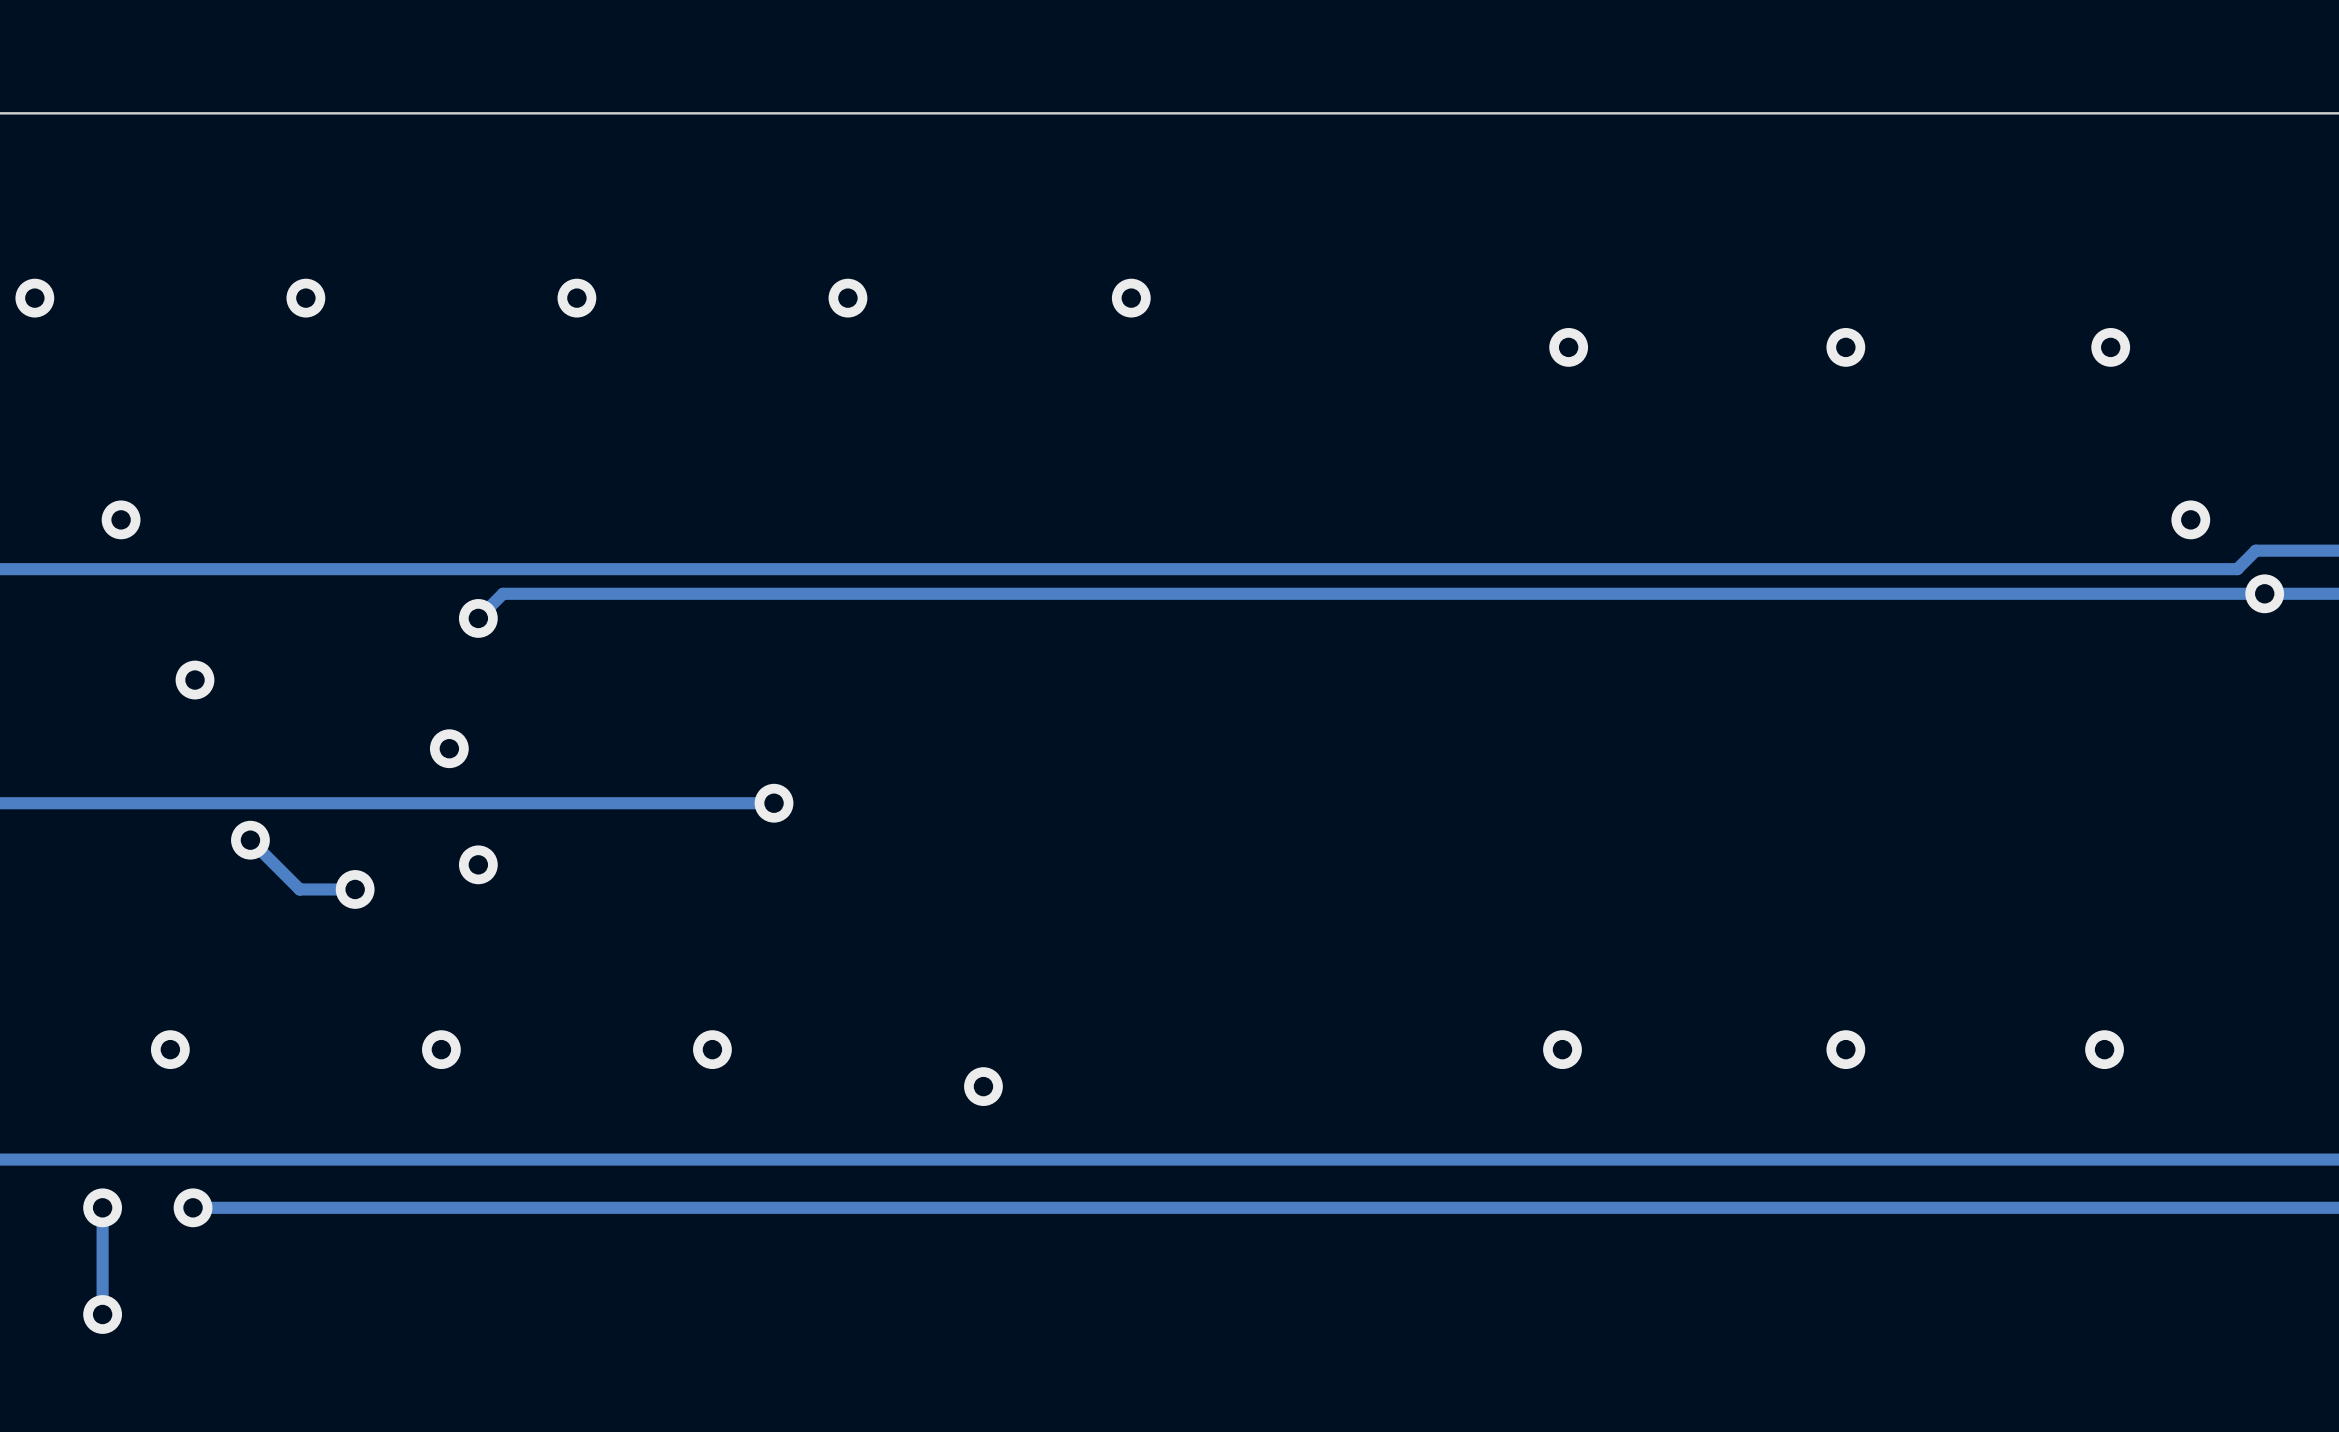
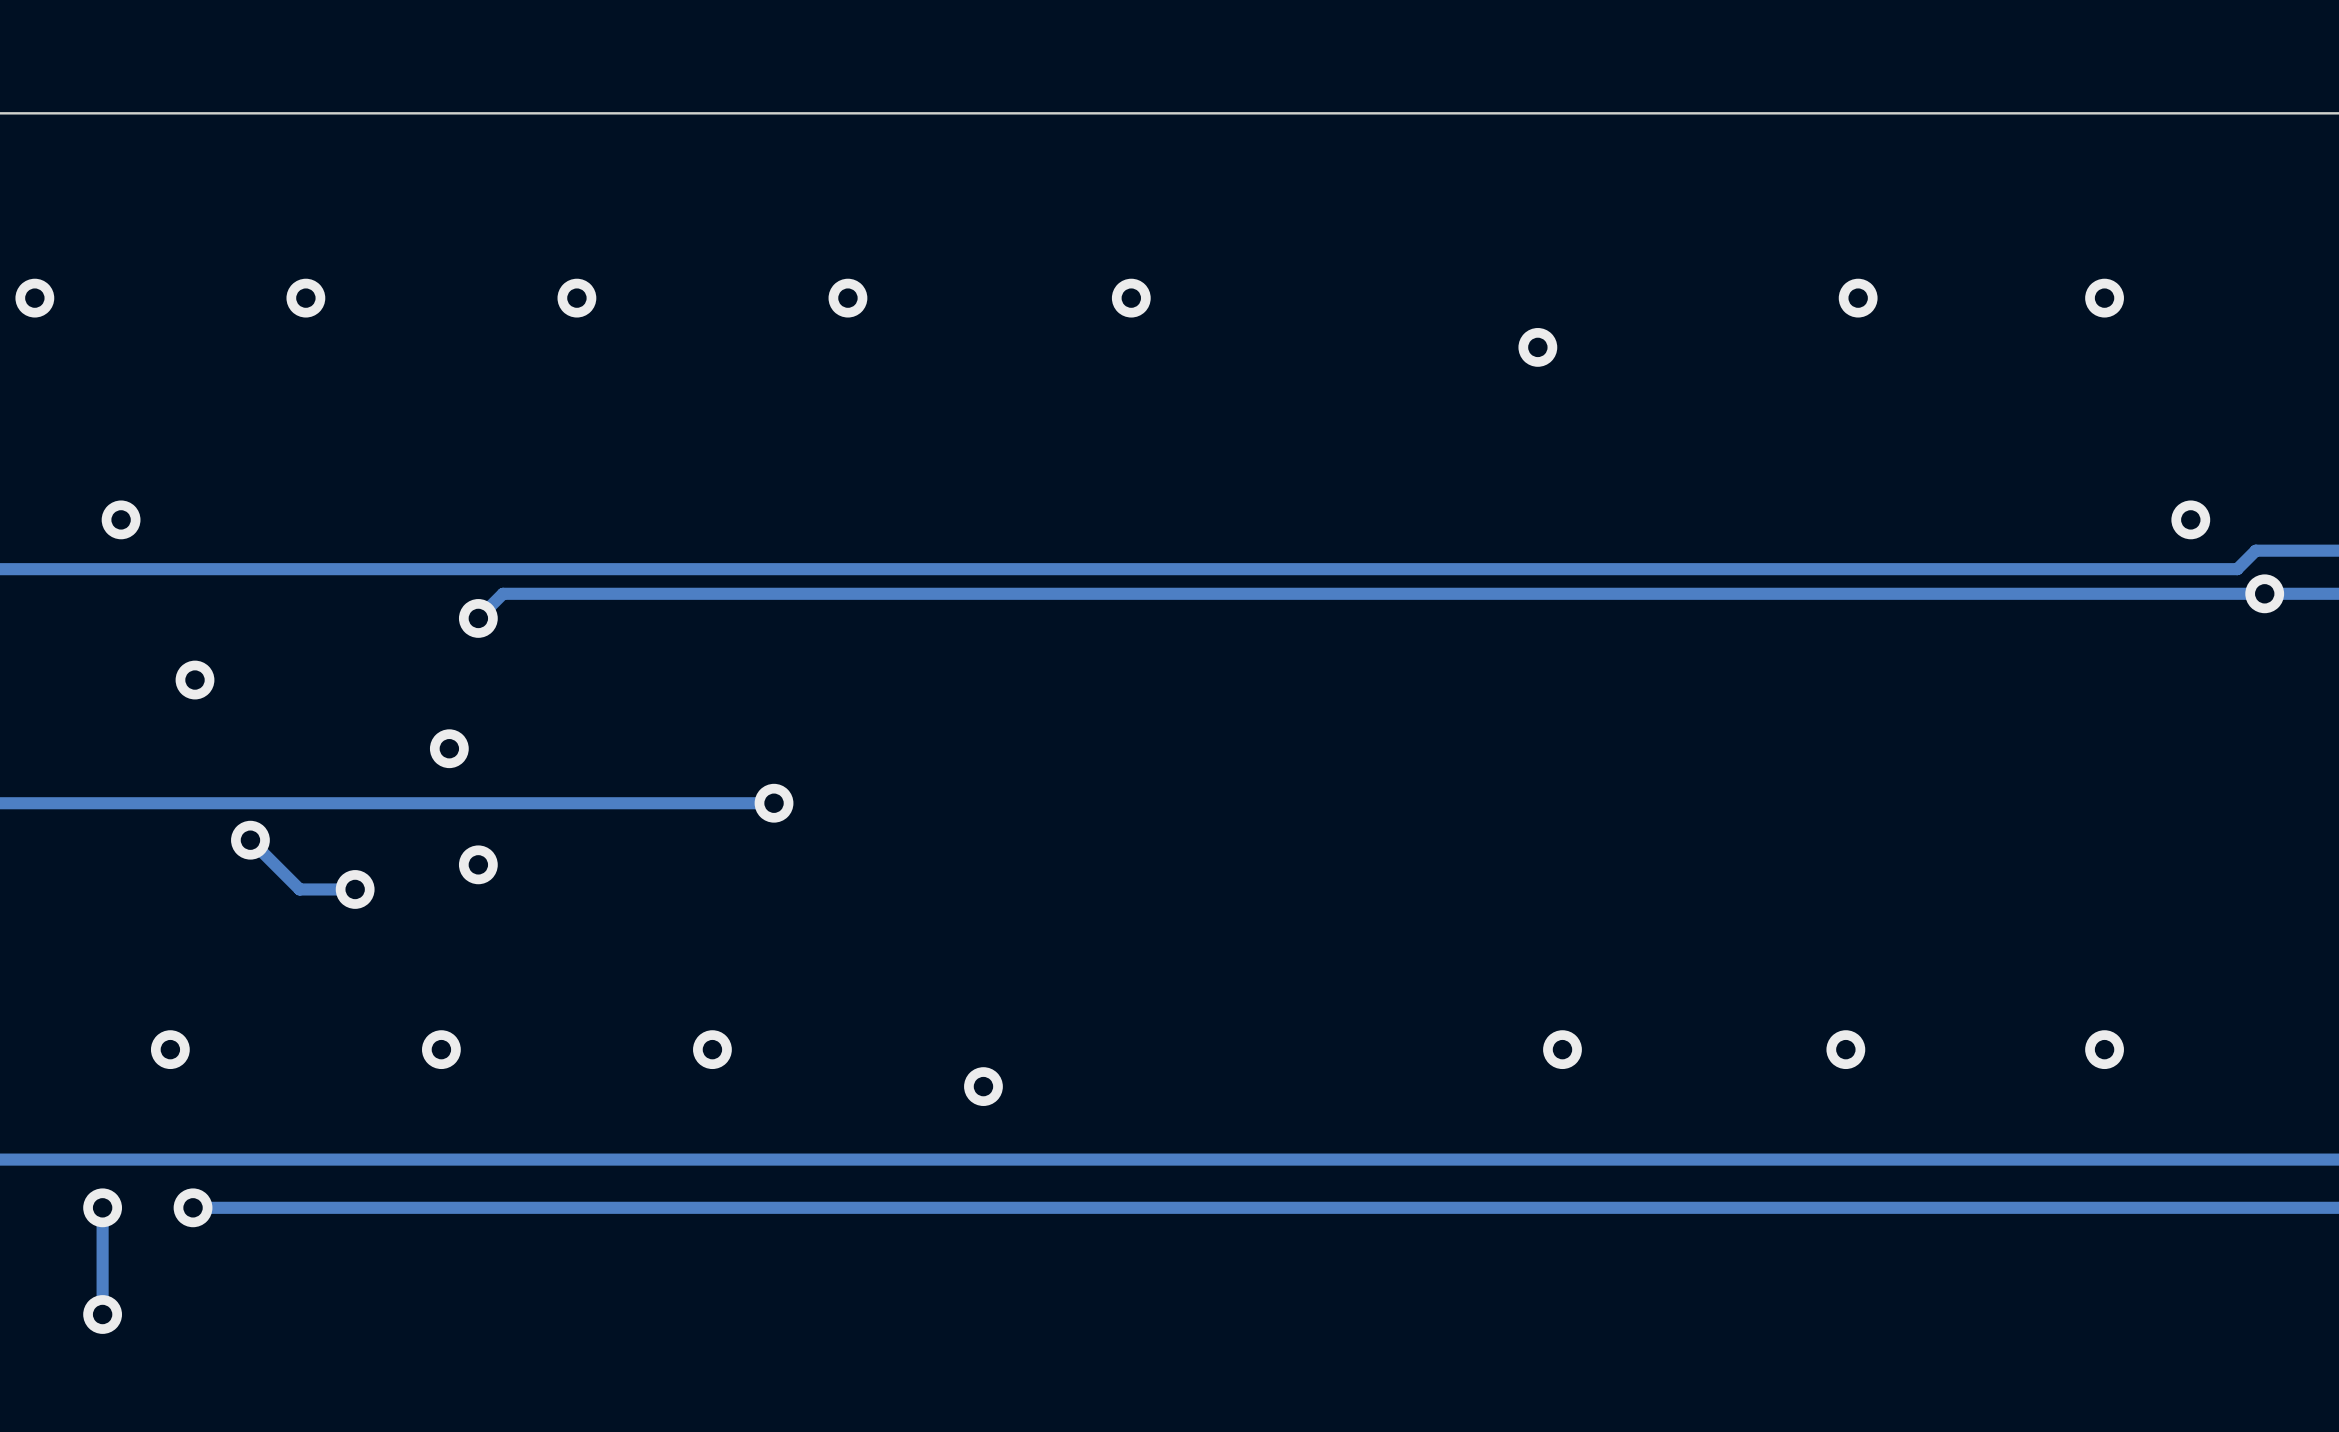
via position: (1568, 347) -> (1537, 347)
via position: (1845, 347) -> (1858, 298)
via position: (2110, 347) -> (2104, 298)

